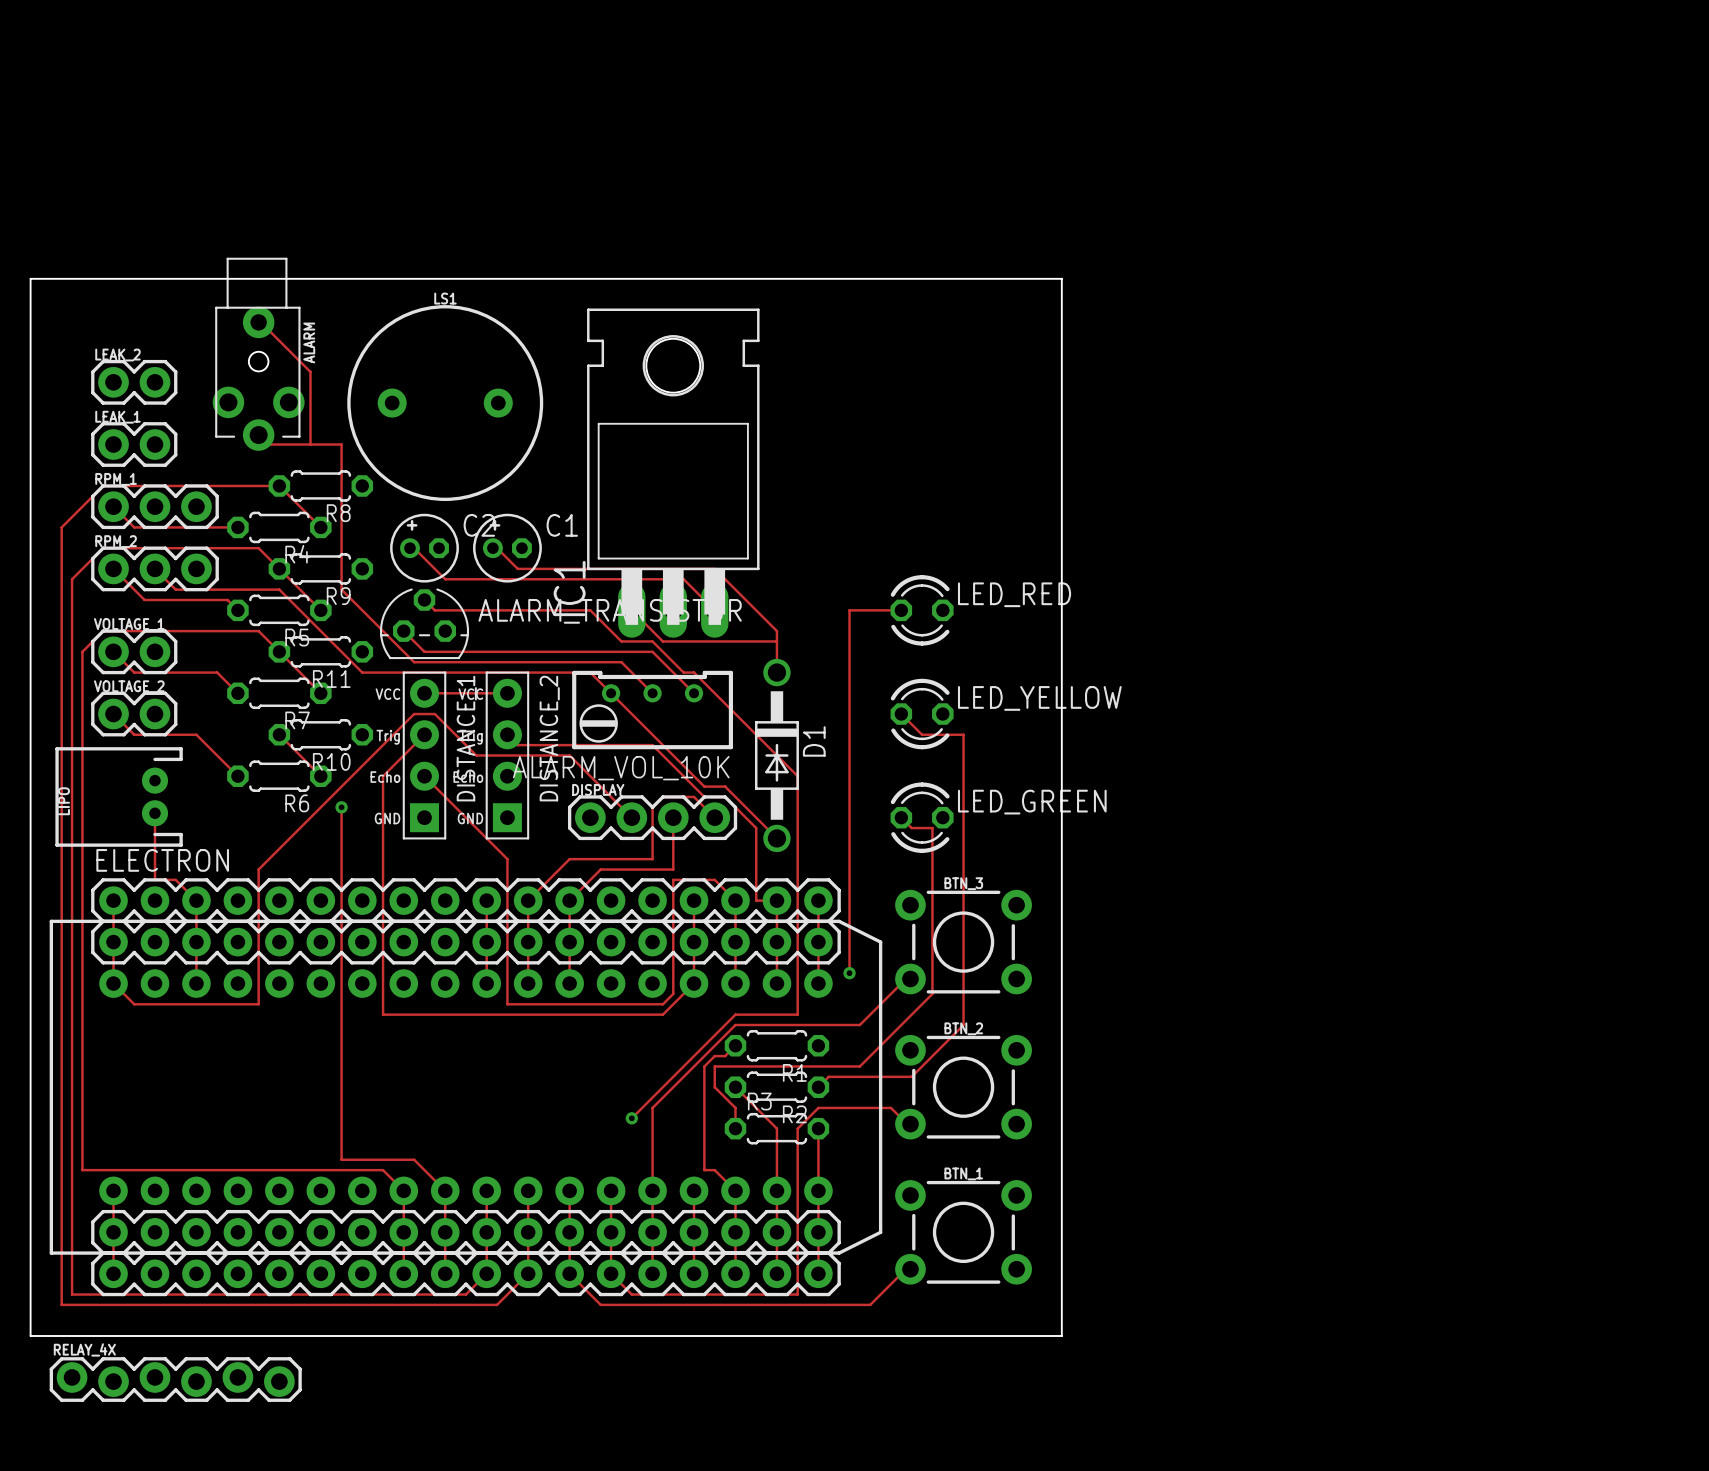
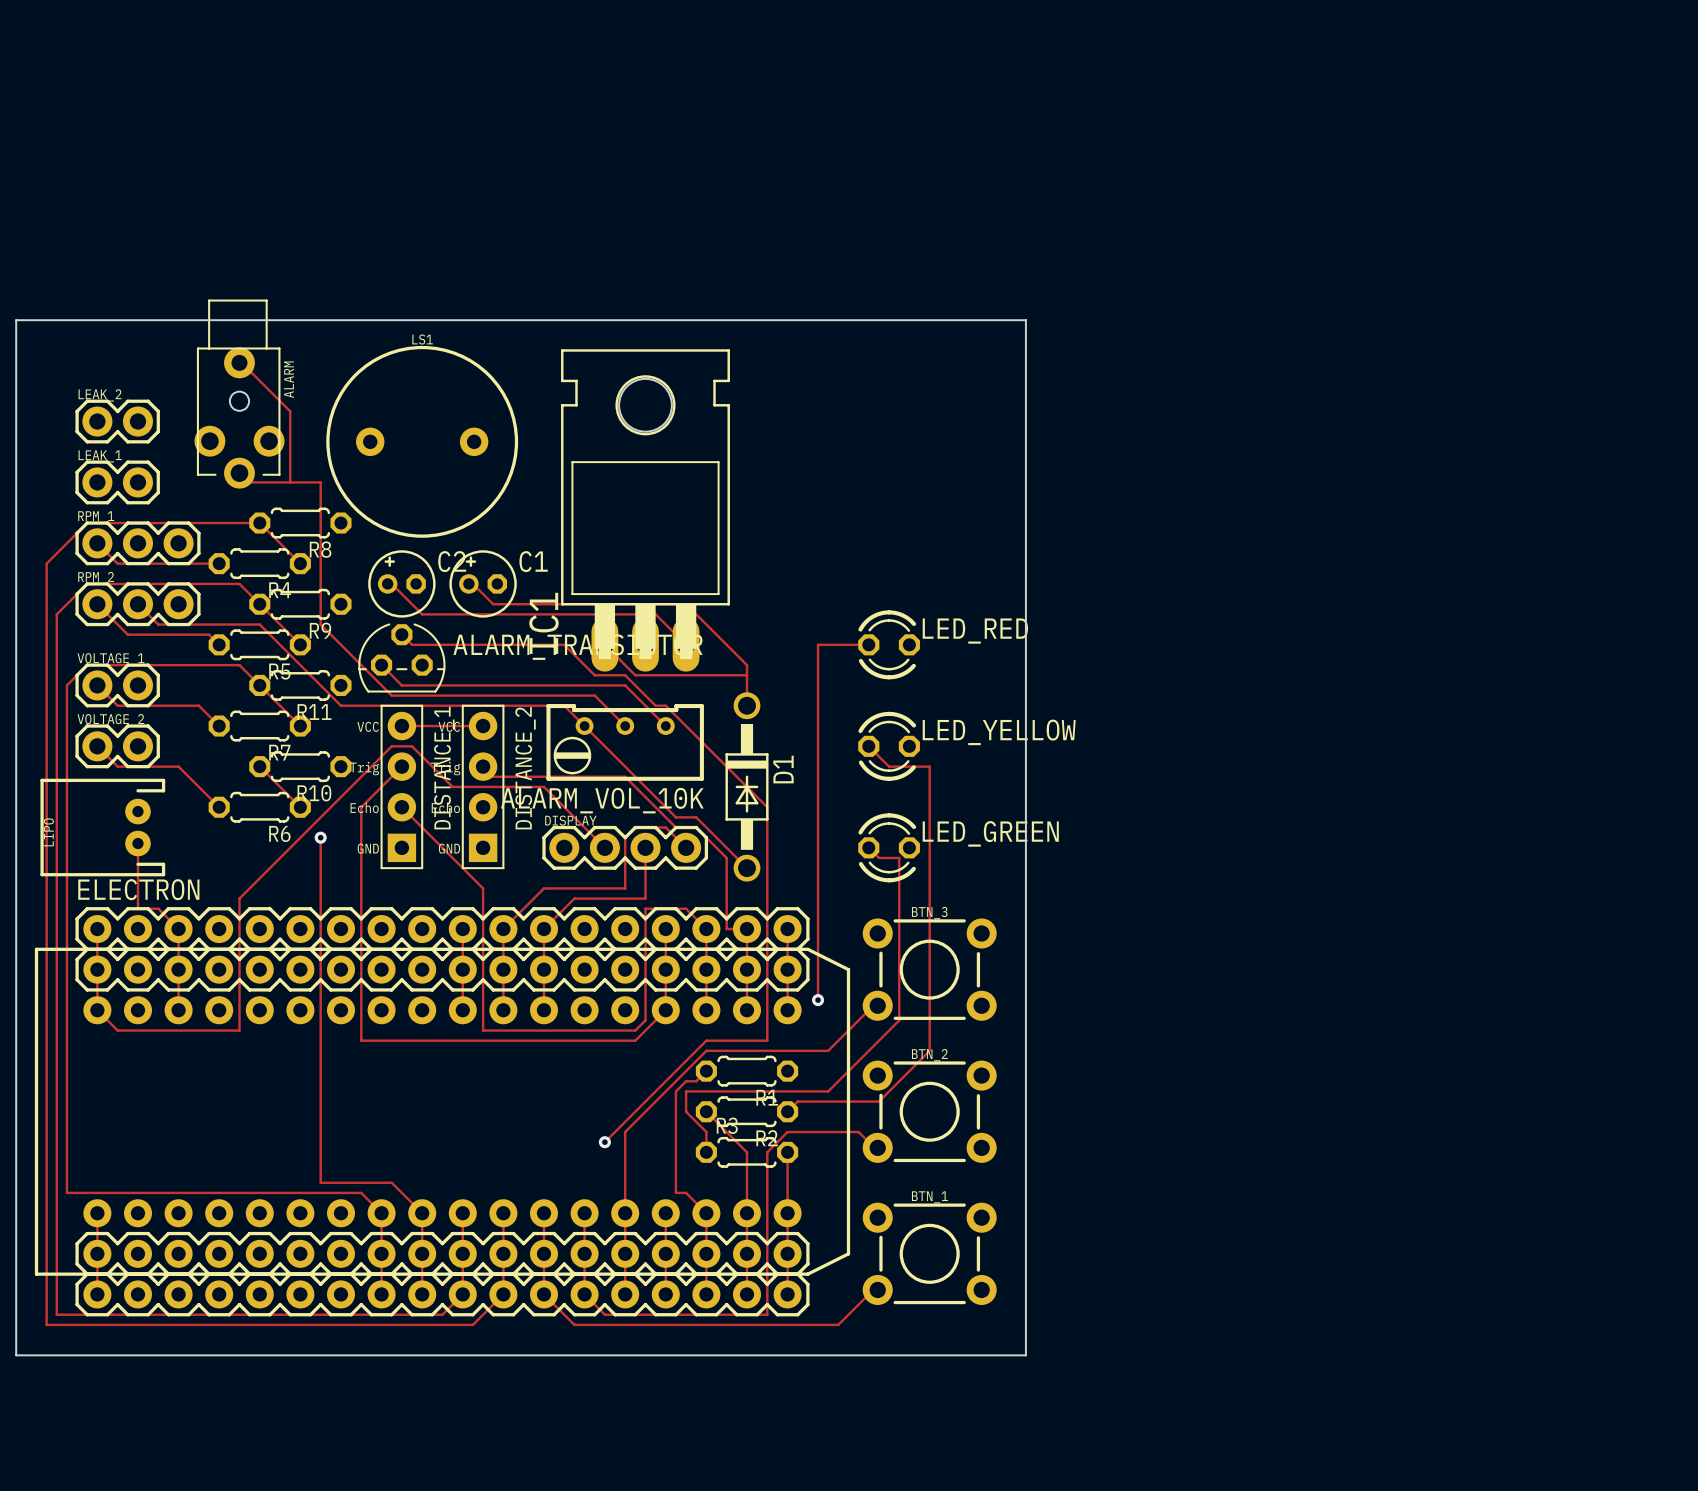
RELAY_4X: (175, 1379) -> none

